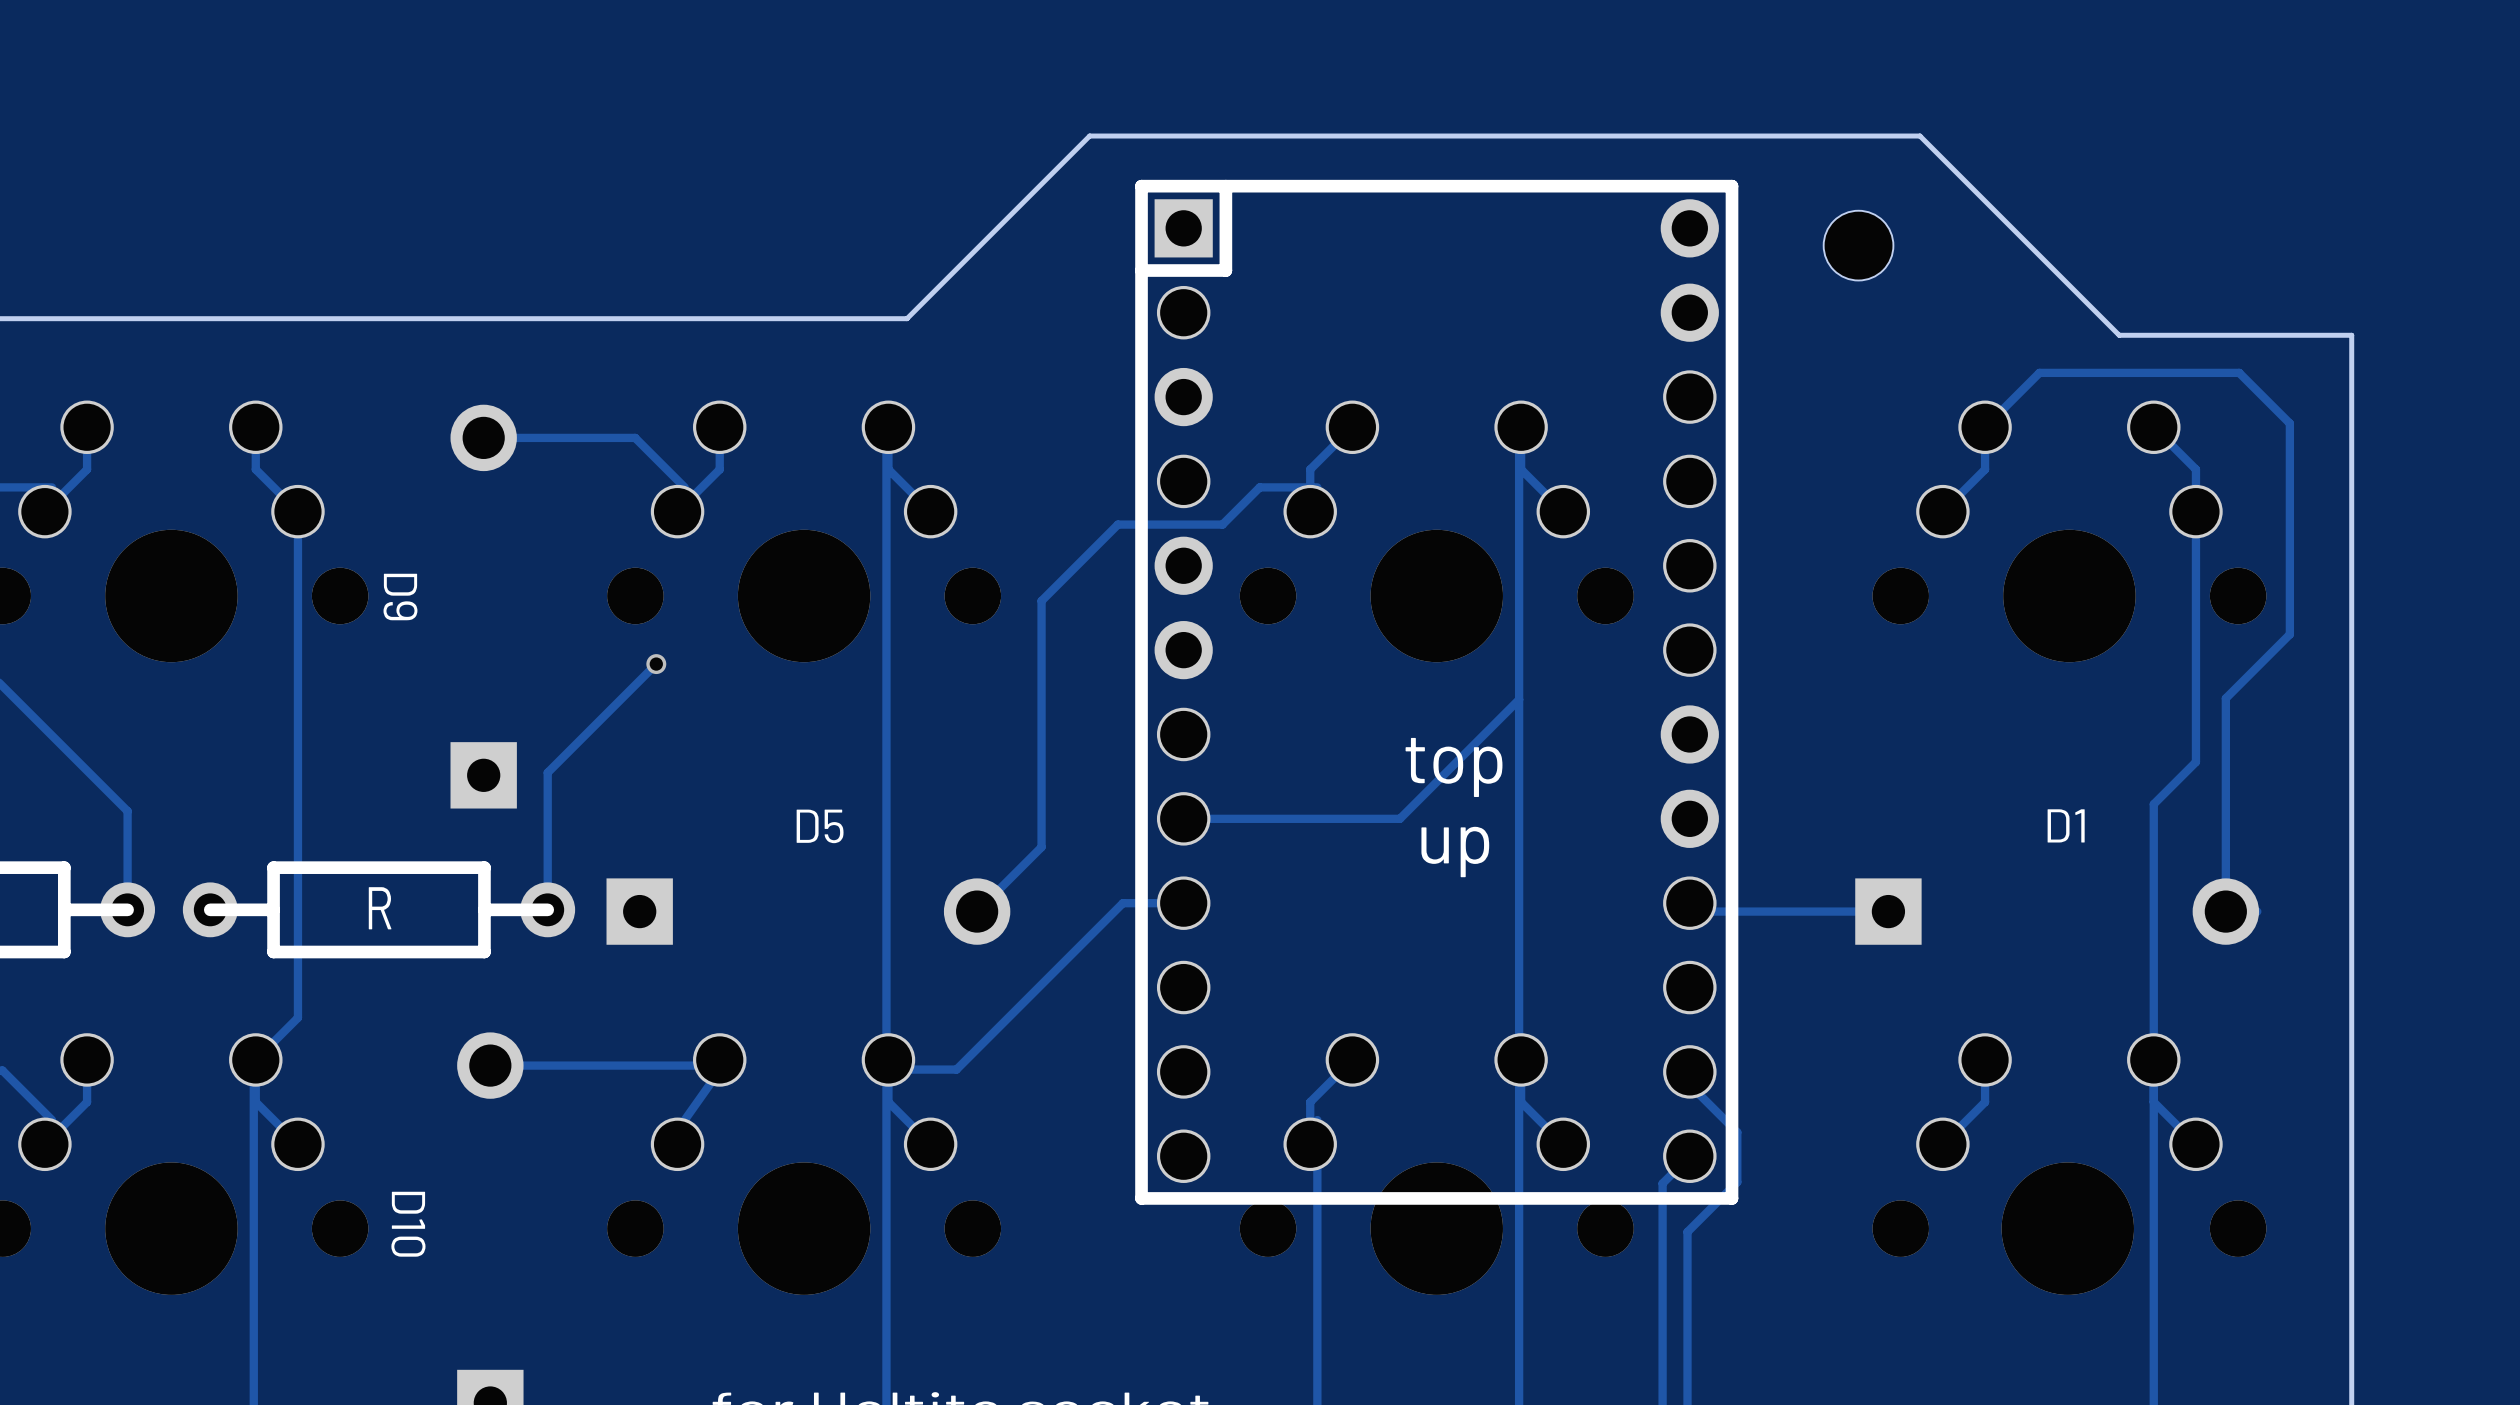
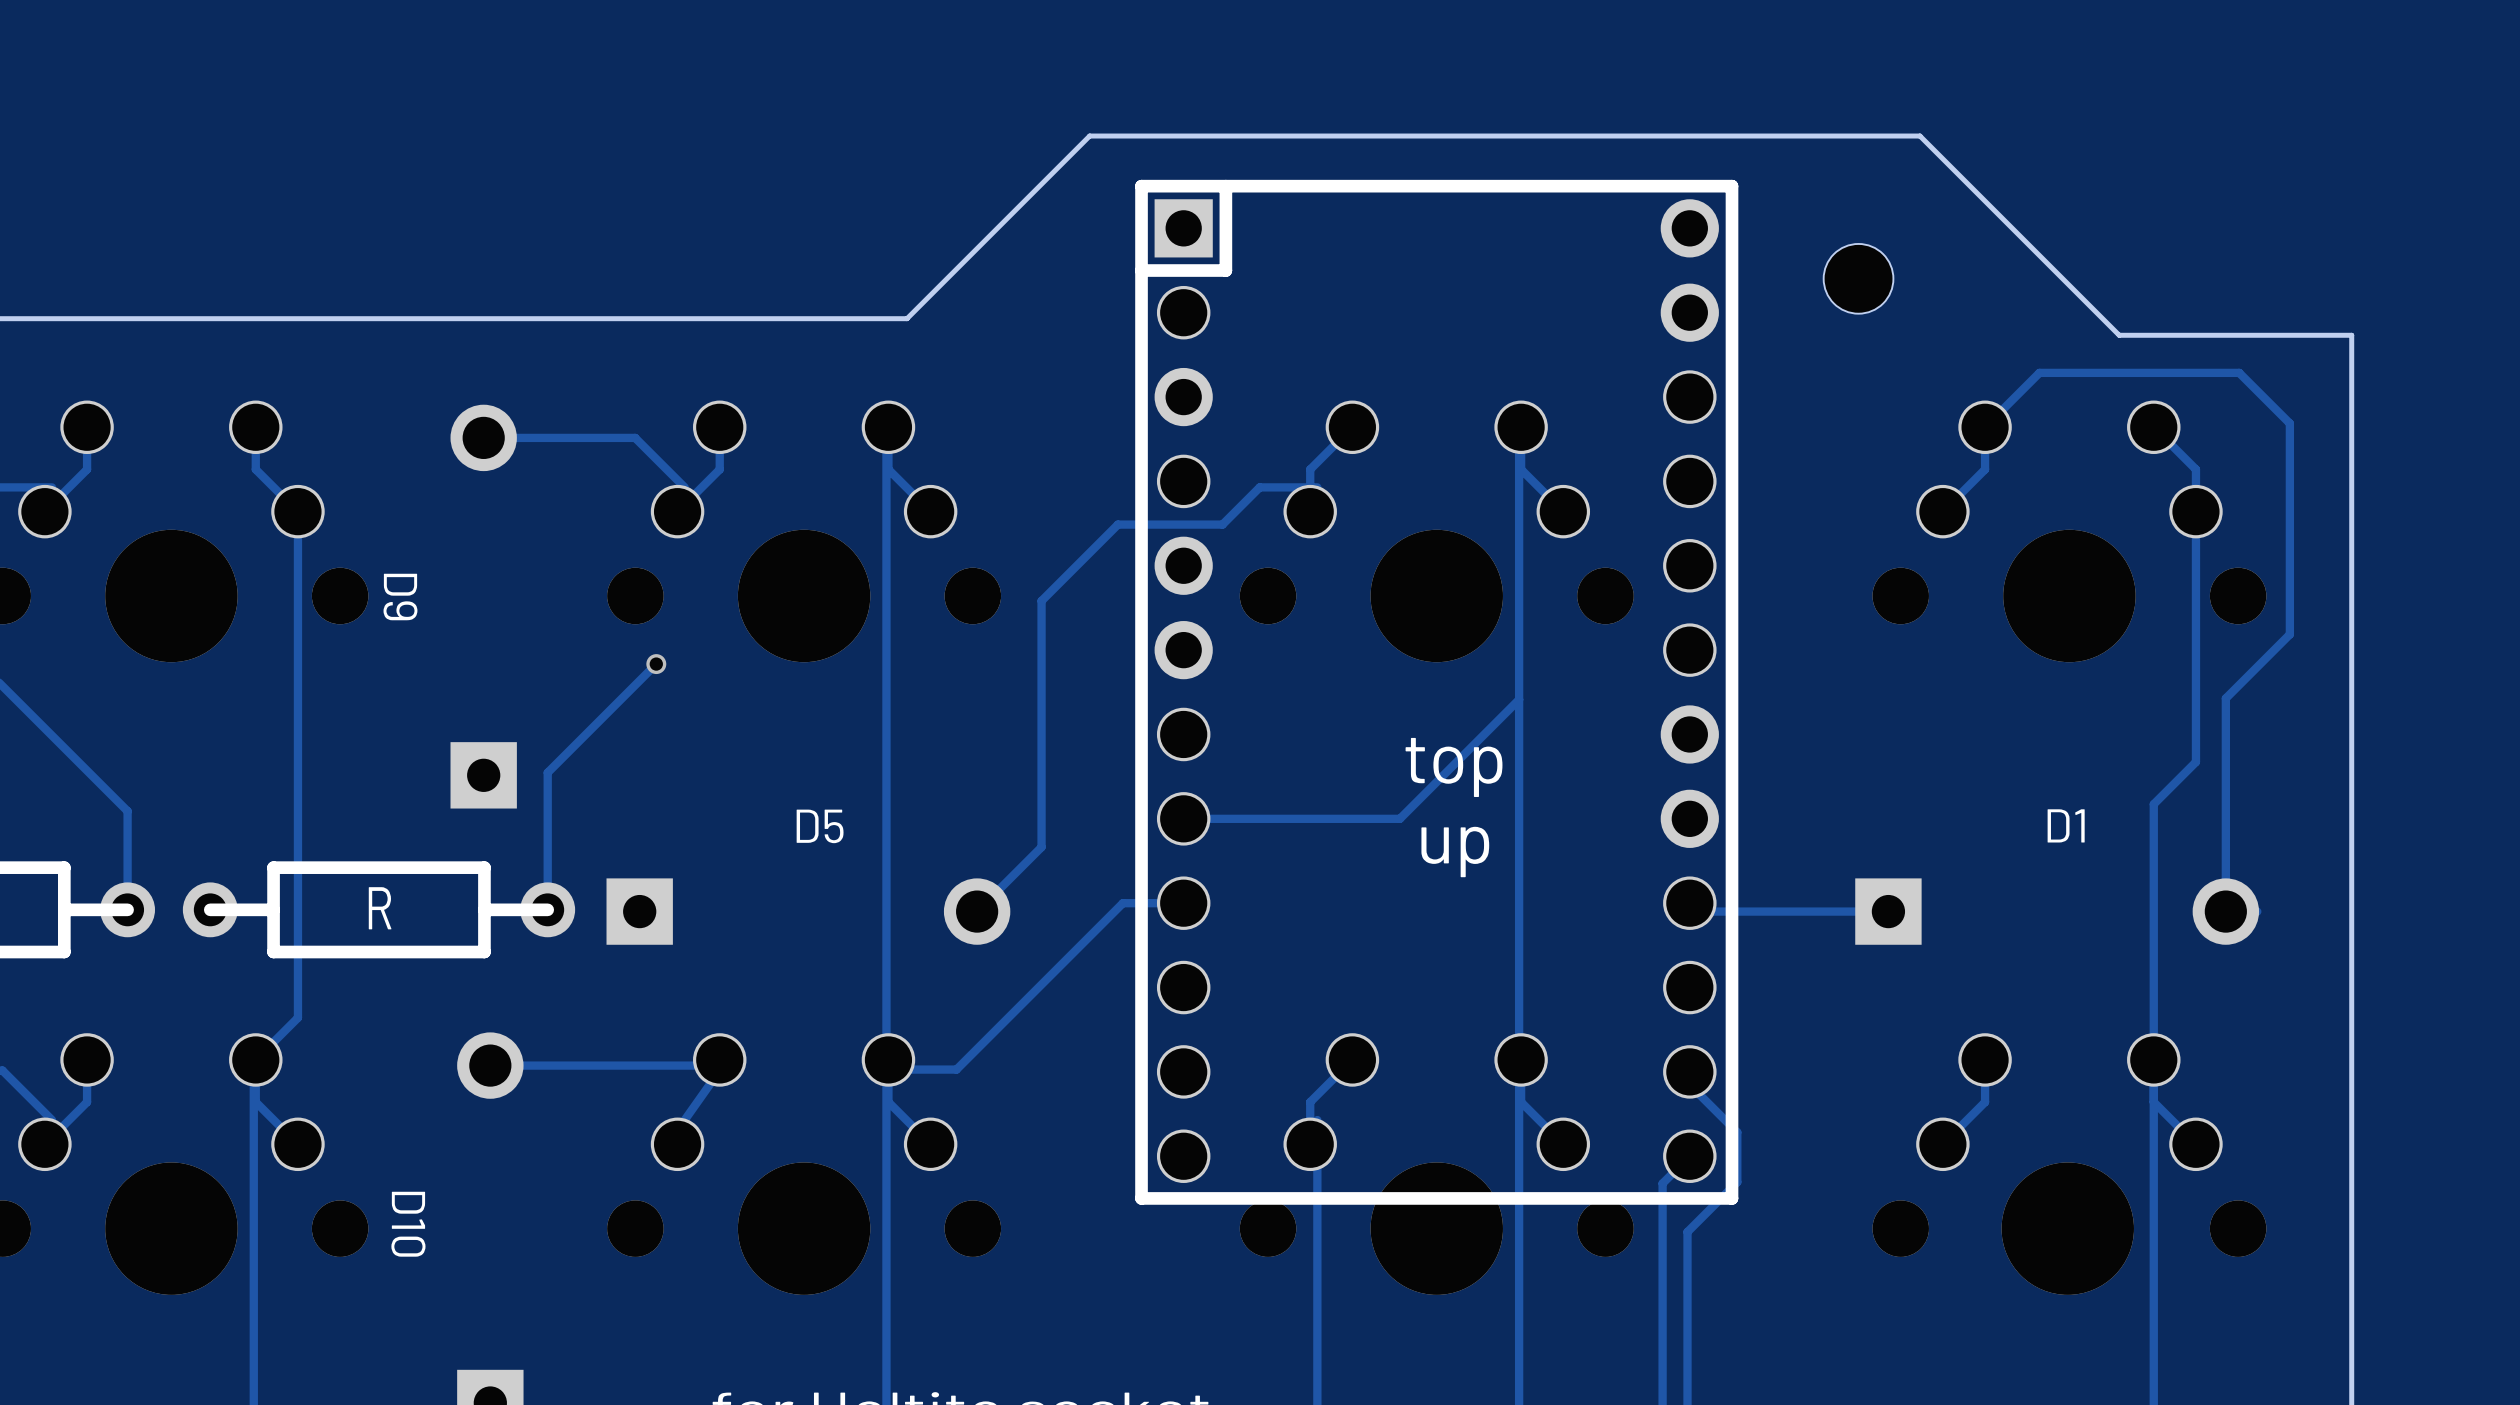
part position: (1858, 245) -> (1858, 278)

